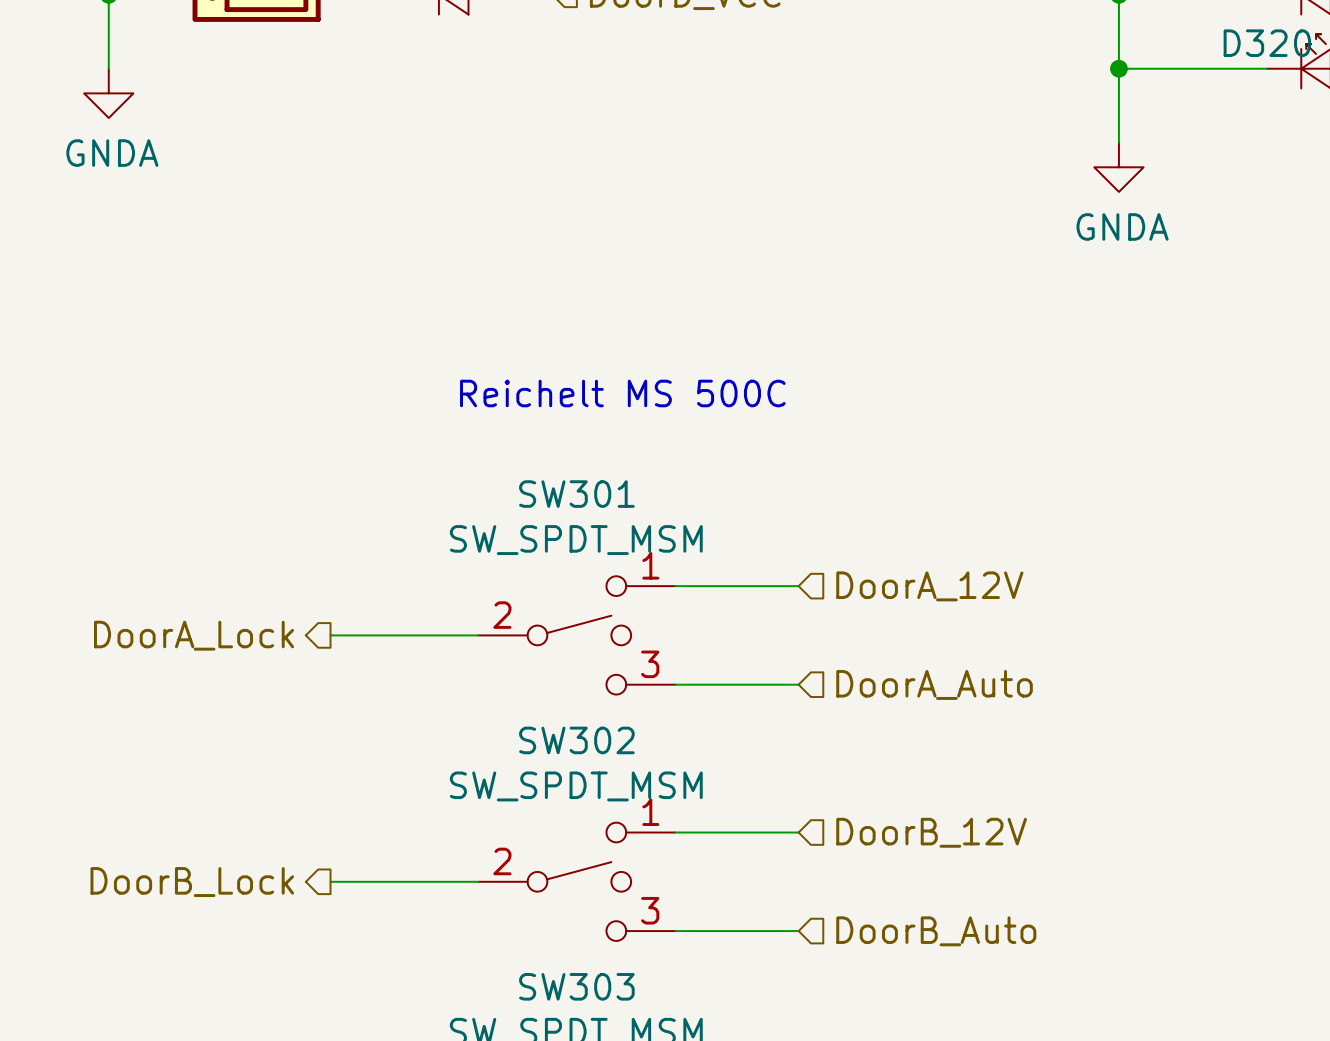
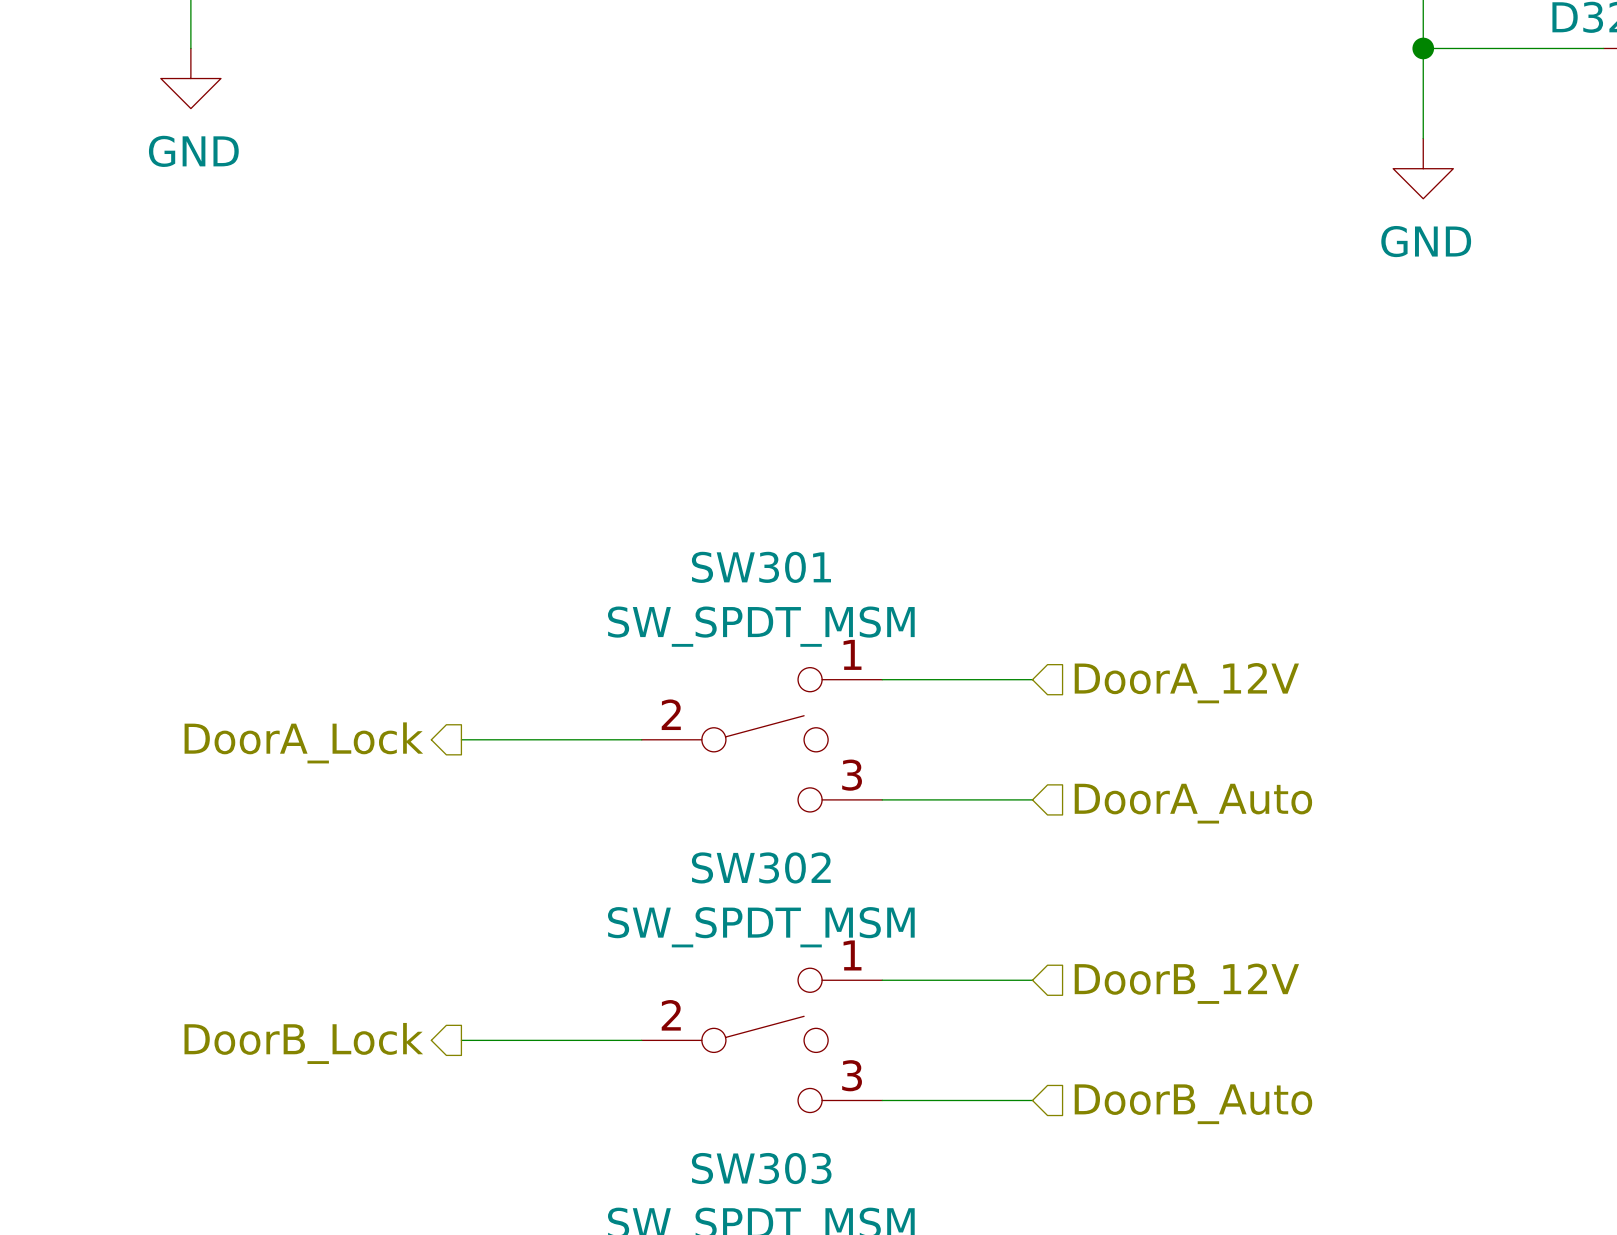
power symbol: GNDA (108, 93) -> GND (190, 78)
power symbol: GNDA (1118, 167) -> GND (1423, 168)
text: Reichelt MS 500C (622, 393) -> none

